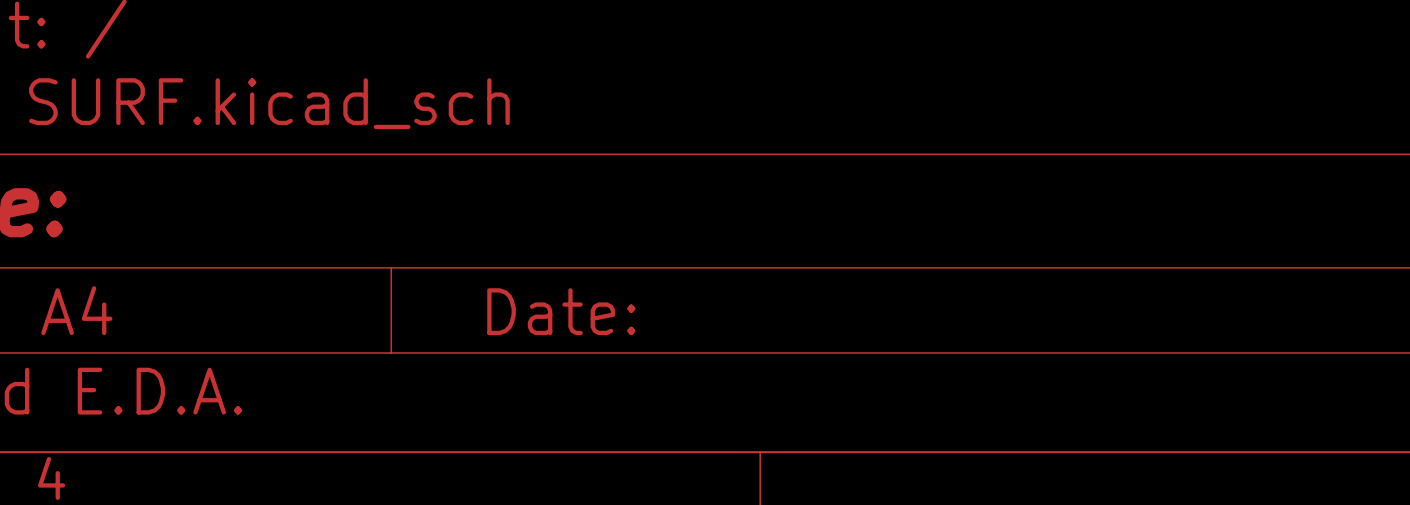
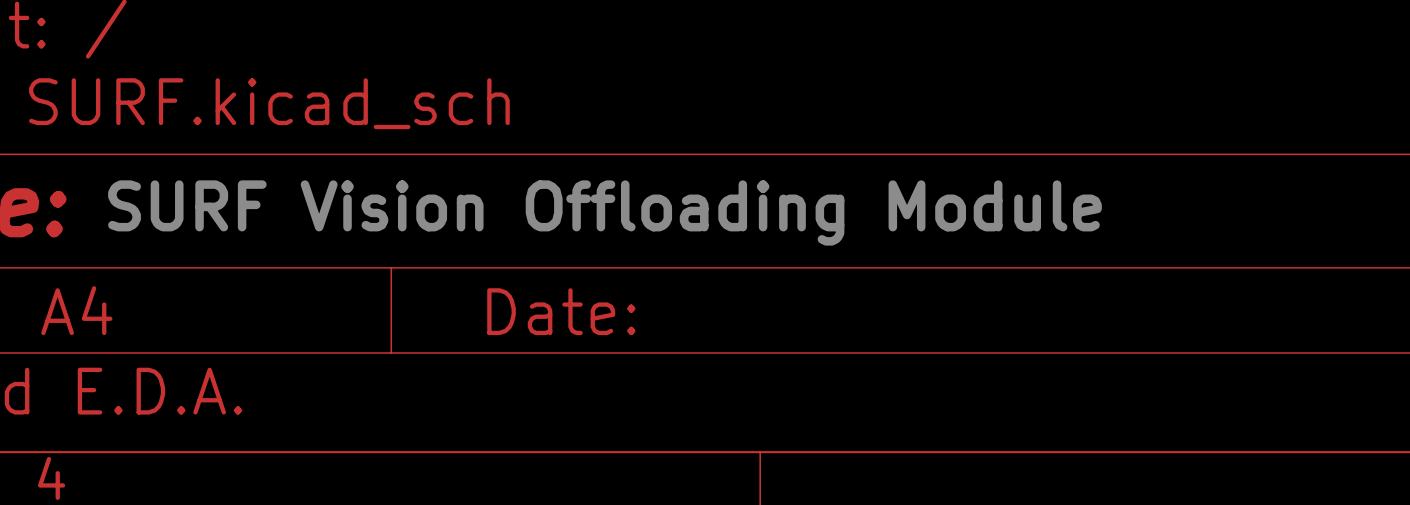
text: none -> SURF Vision Offloading Module (604, 212)

